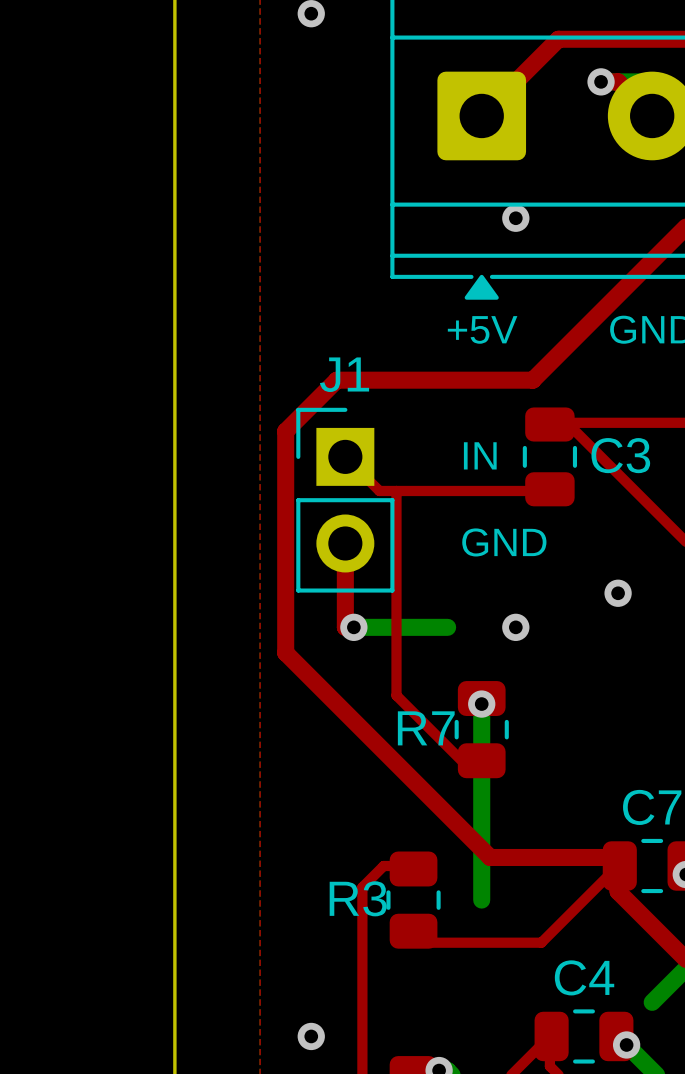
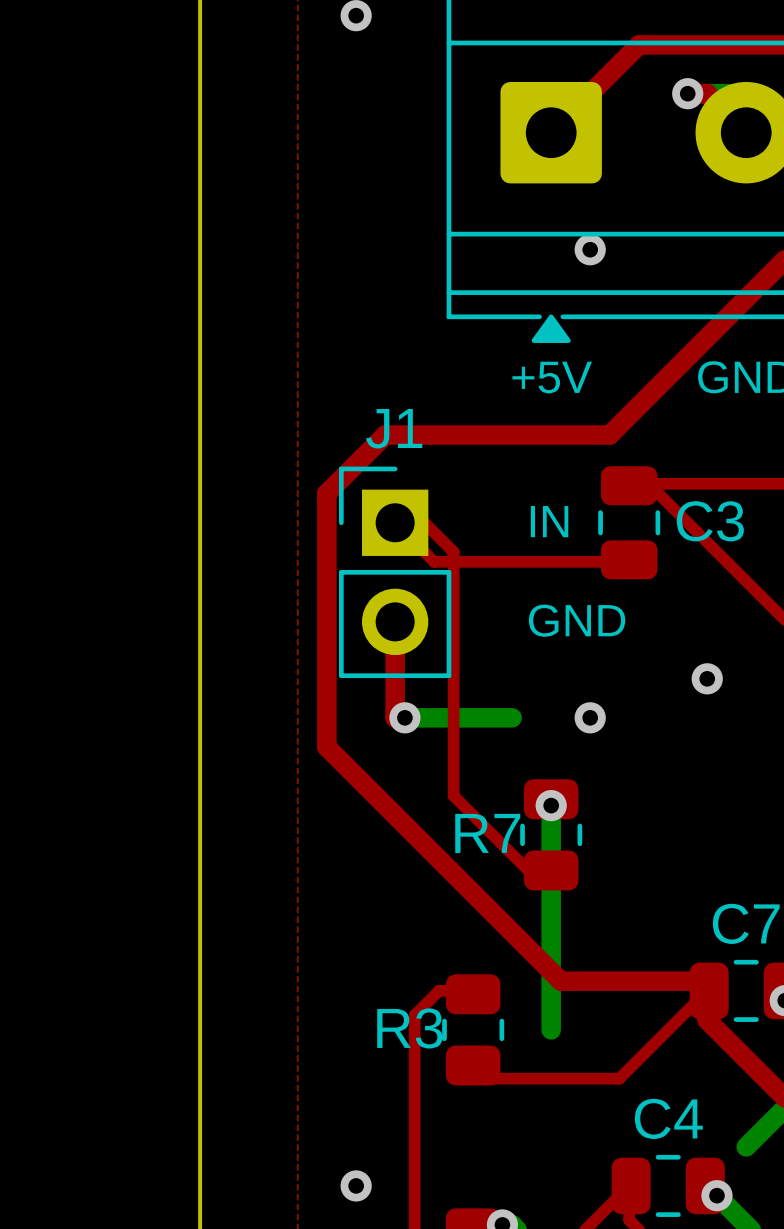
top track: none -> (395, 522) (424, 522) (453, 552) (453, 561)

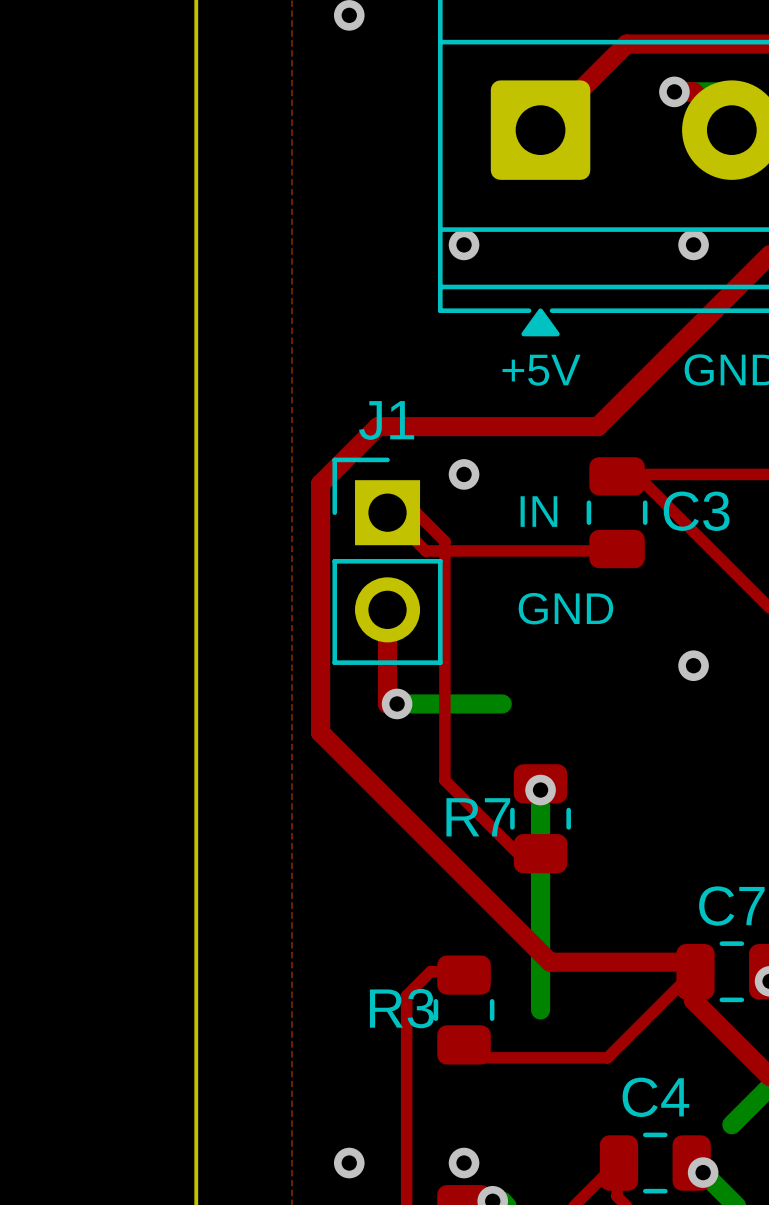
via: none -> (464, 244)
via: (590, 249) -> none
via: none -> (693, 244)
via: none -> (464, 474)
via: (590, 717) -> none
via: none -> (464, 1163)

